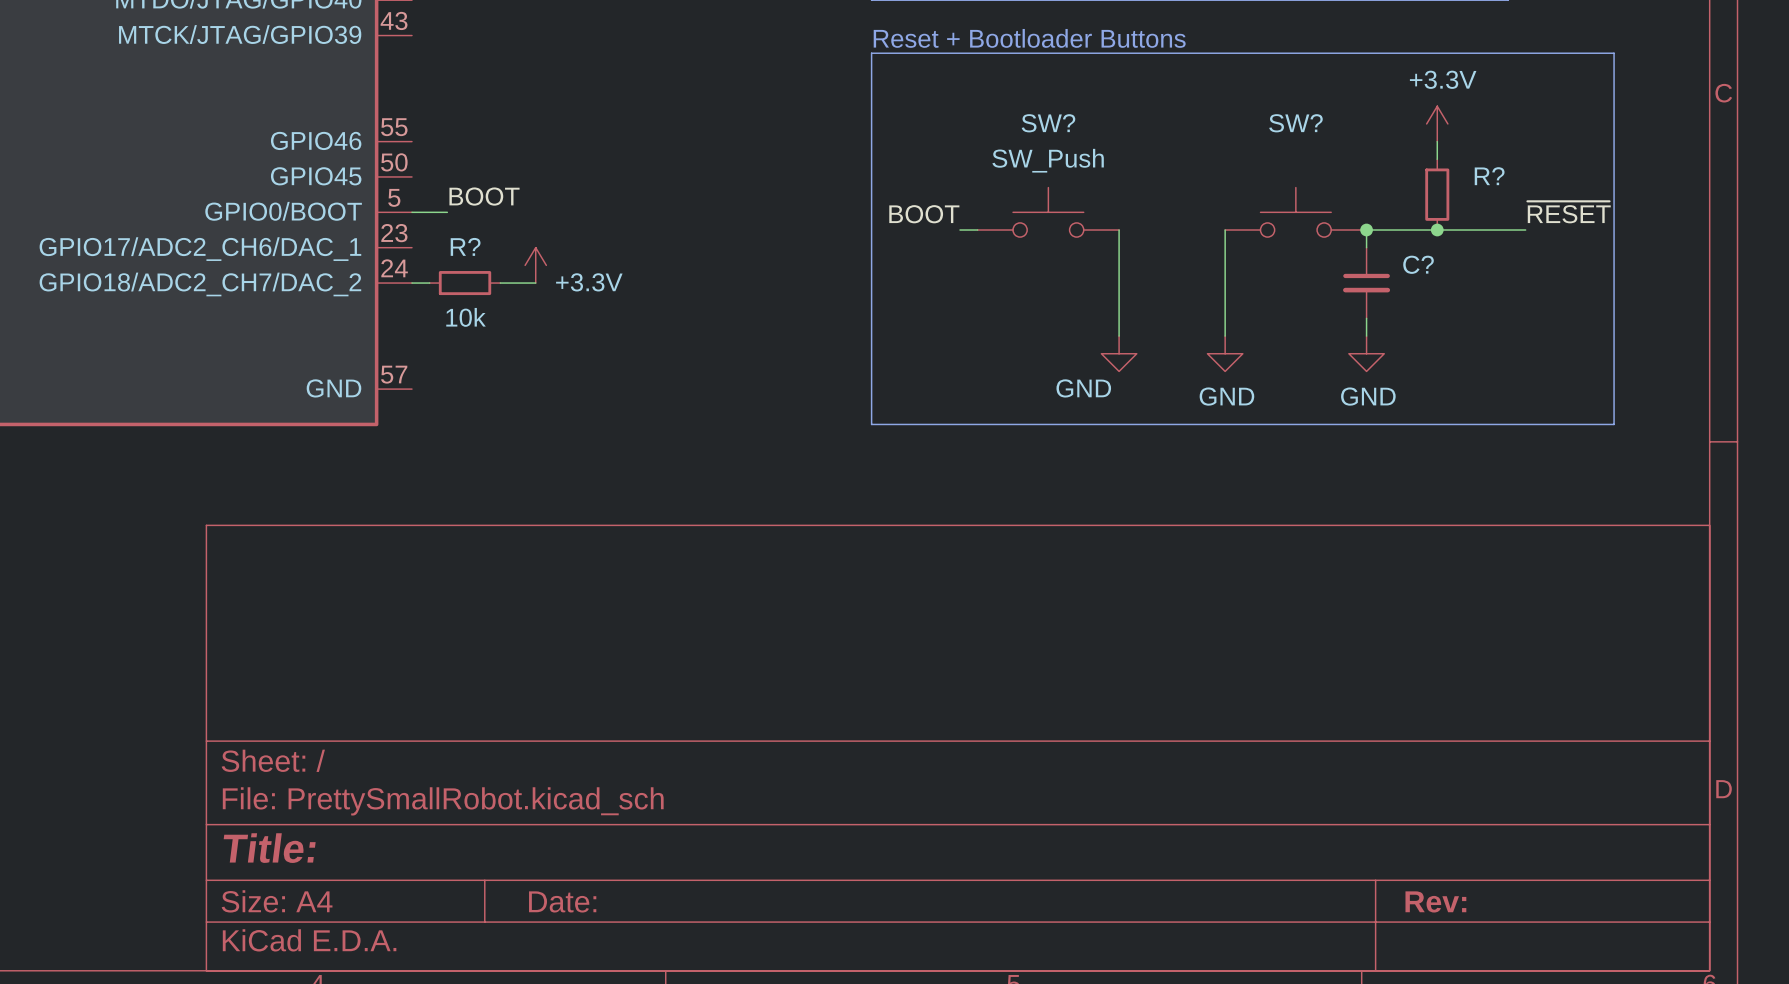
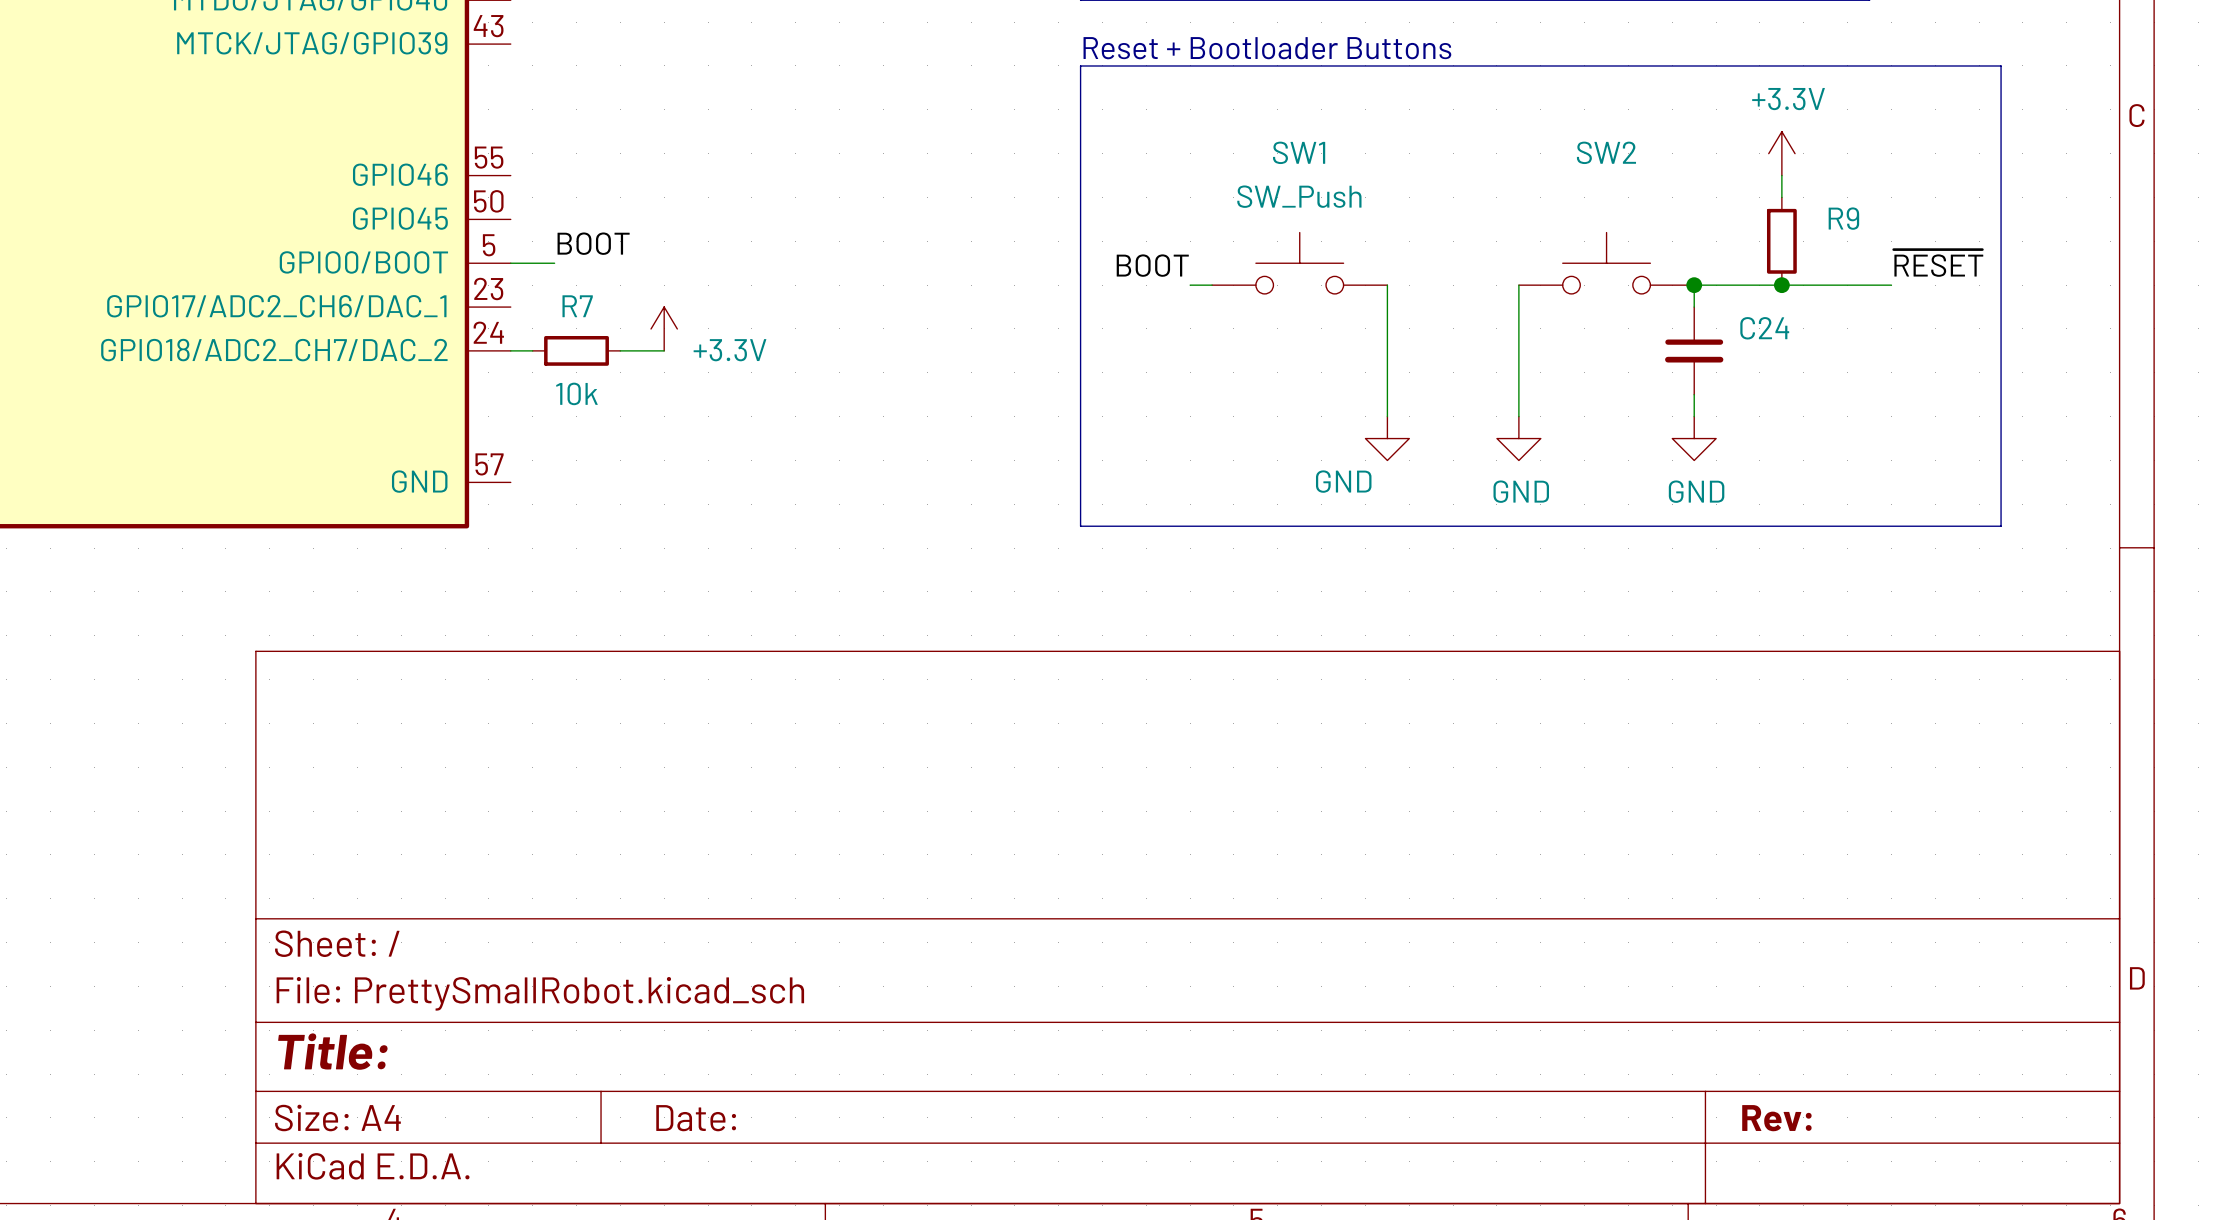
SW? name: SW? (1048, 123) -> SW1 (1299, 152)
SW? name: SW? (1295, 123) -> SW2 (1606, 152)
R? name: R? (1489, 176) -> R9 (1843, 218)
R? name: R? (465, 246) -> R7 (577, 306)
C? name: C? (1418, 264) -> C24 (1764, 328)

